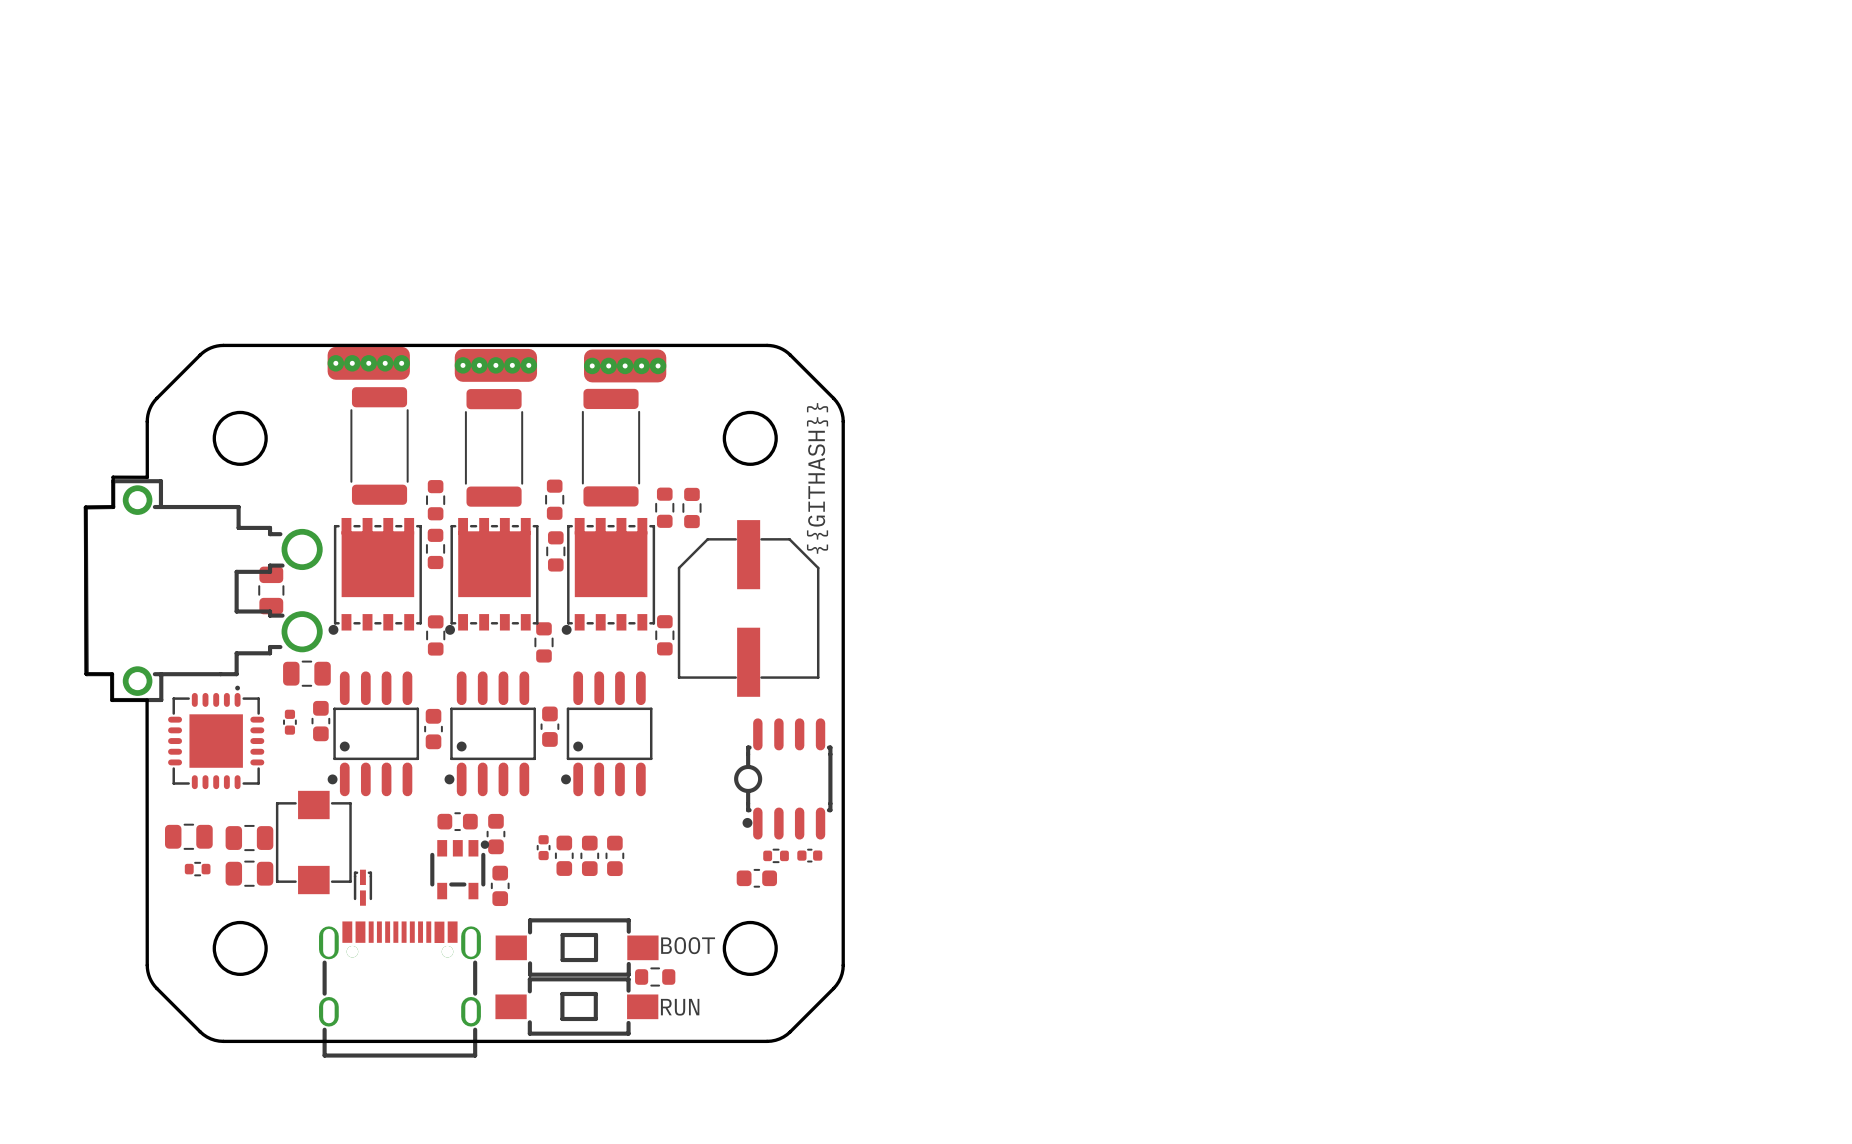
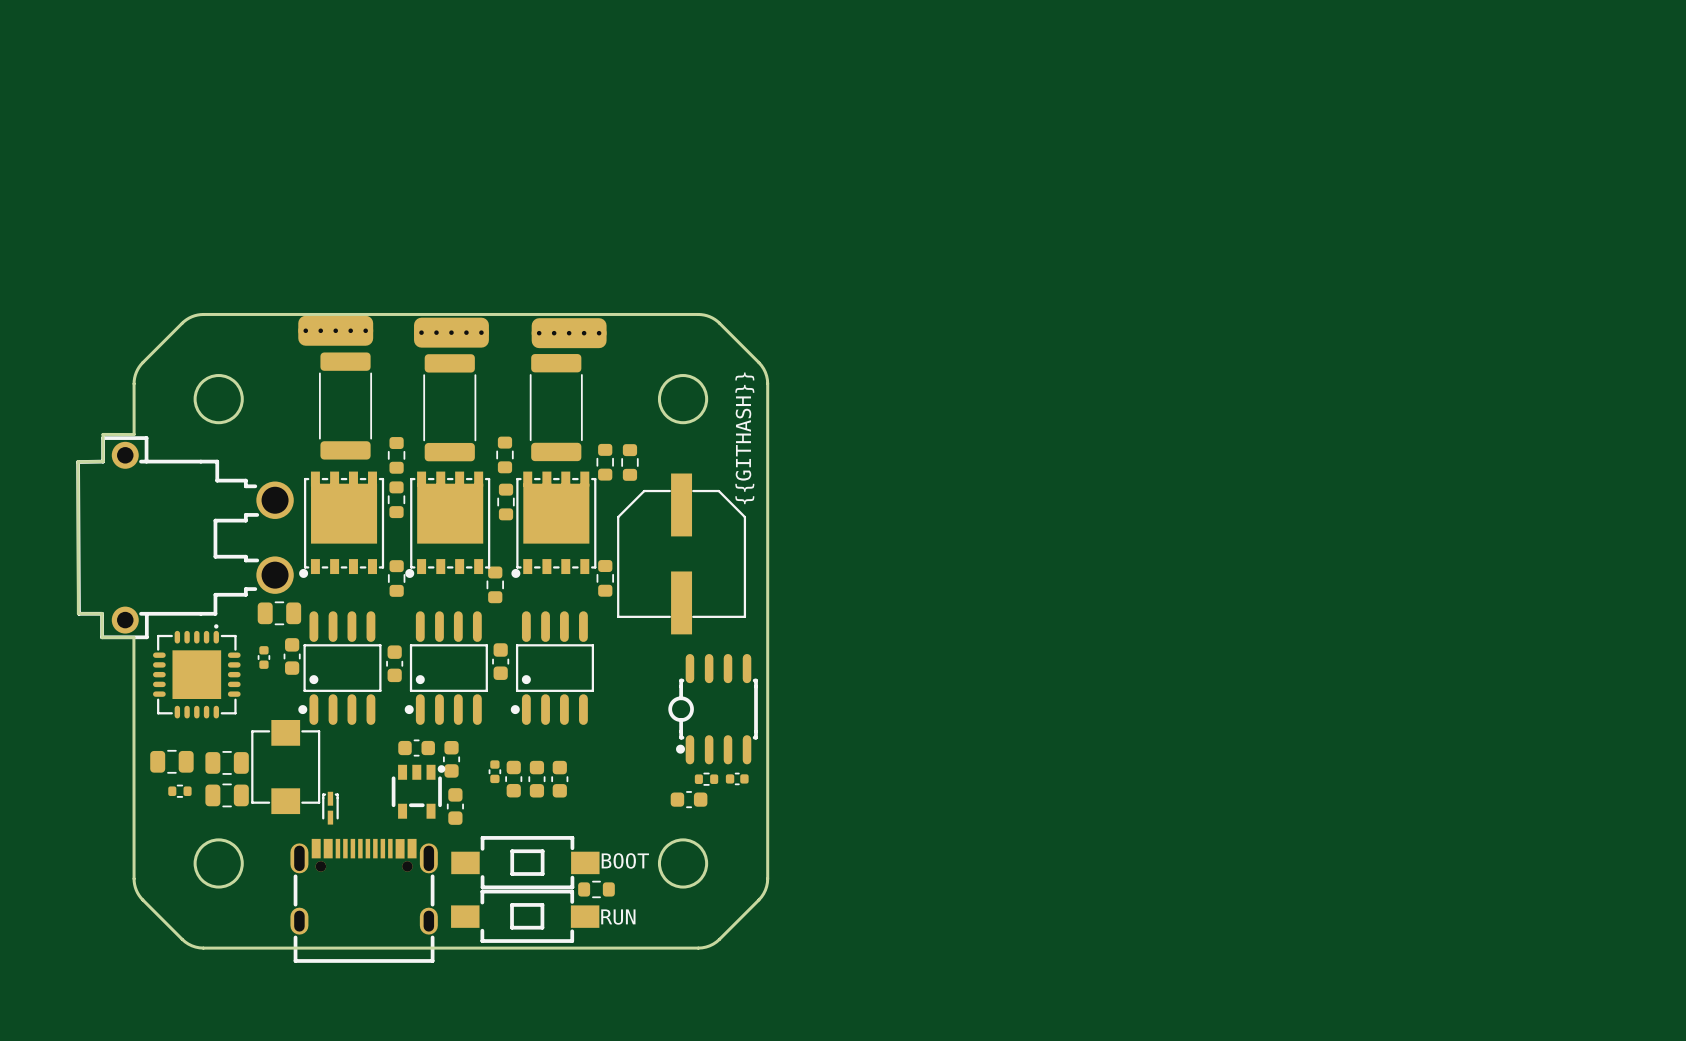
part: (271, 590) -> none

